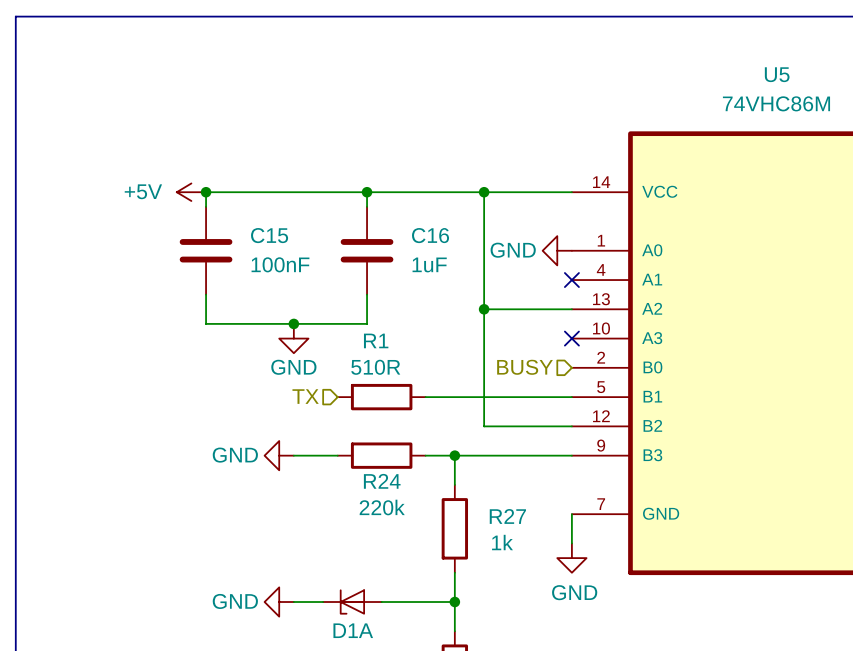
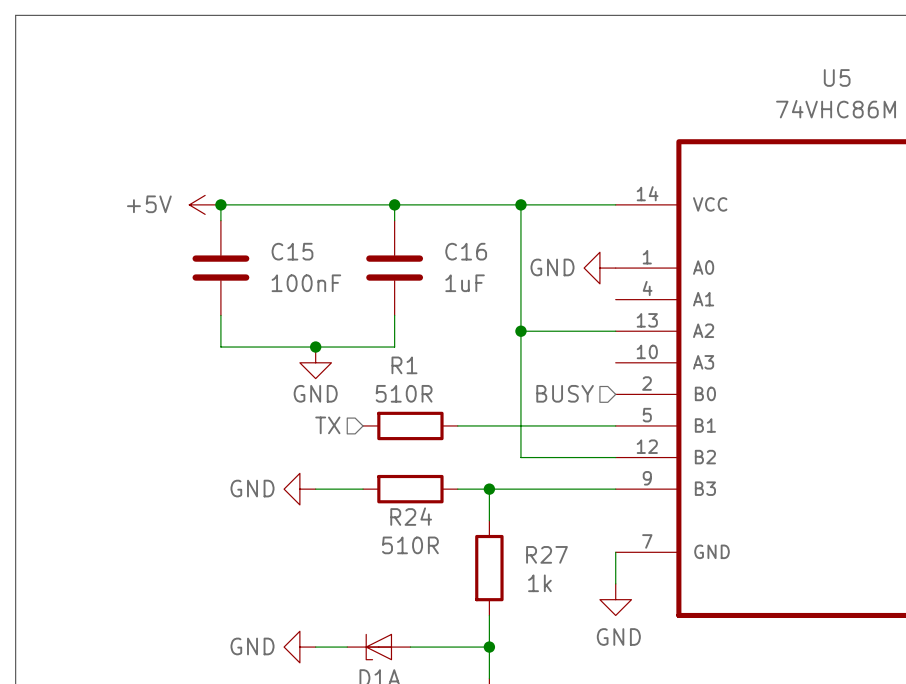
no-connect mark: (571, 280) -> none
no-connect mark: (571, 338) -> none
R24 value: 220k (382, 507) -> 510R (410, 545)

